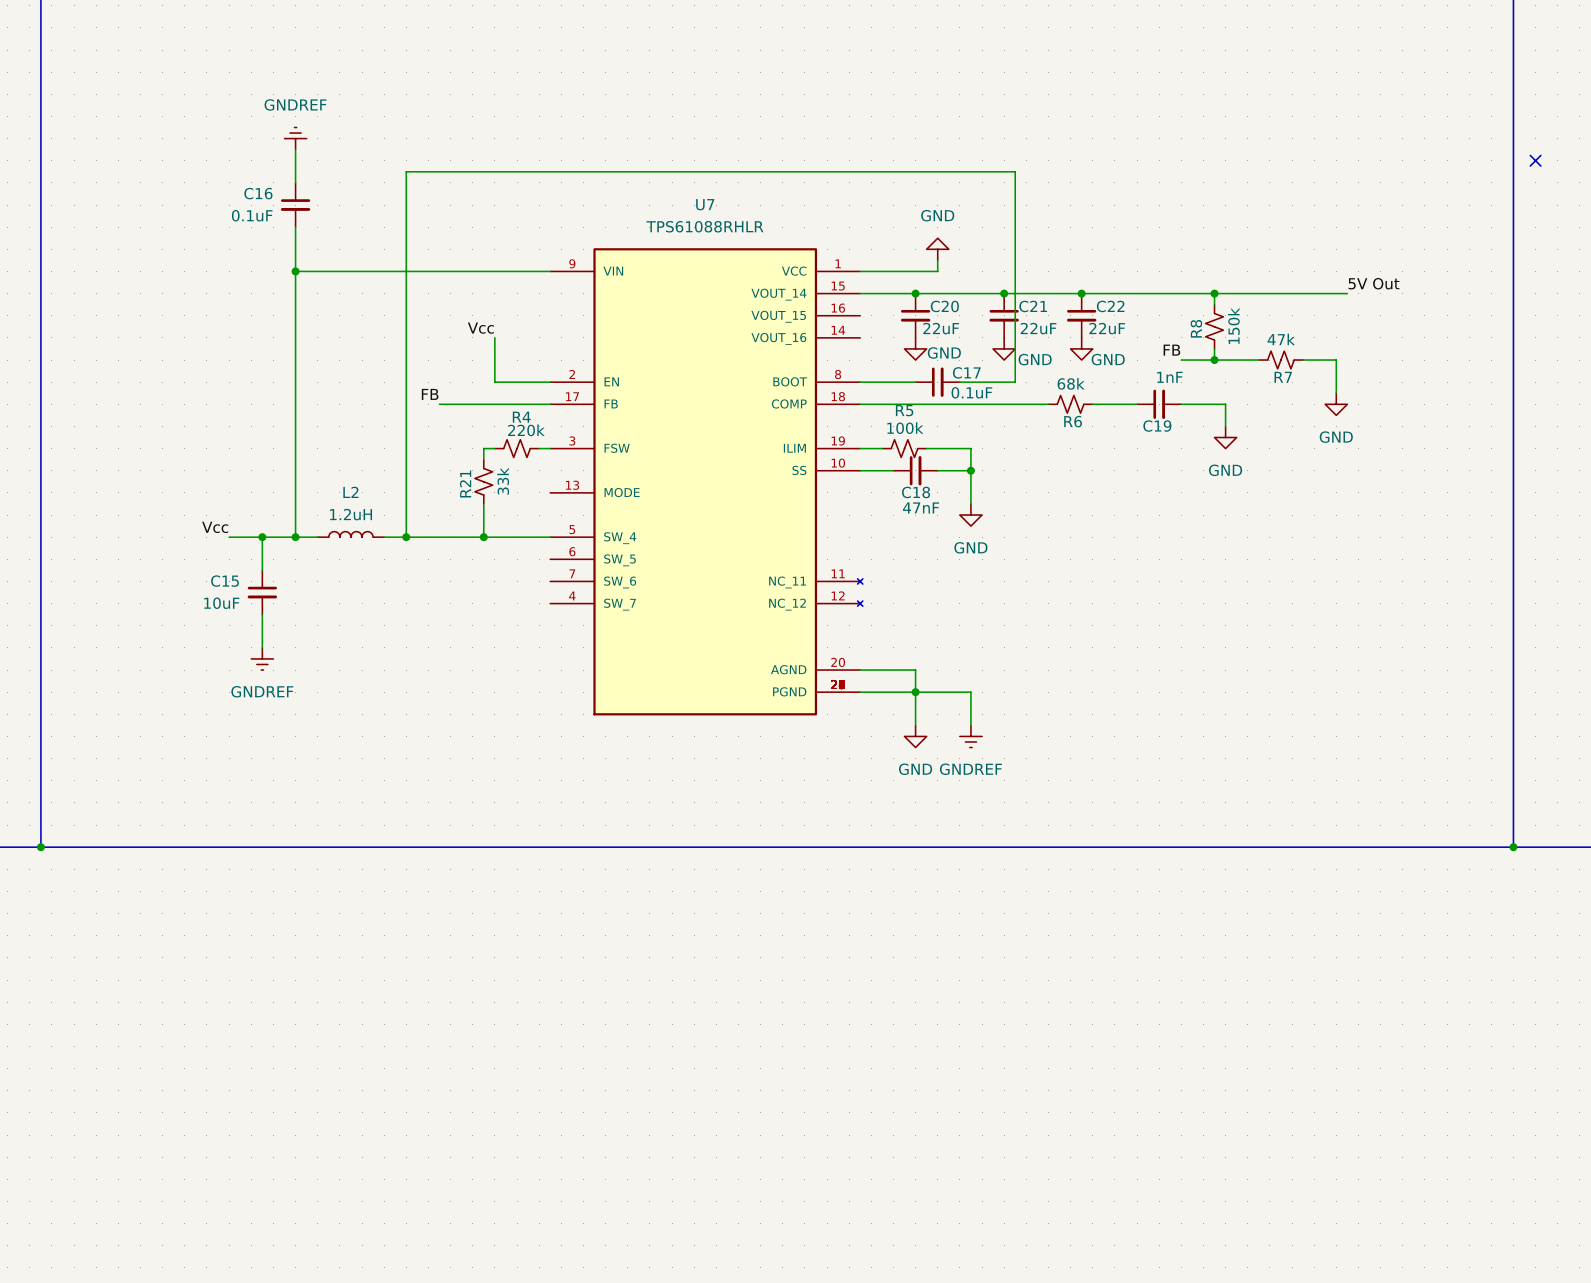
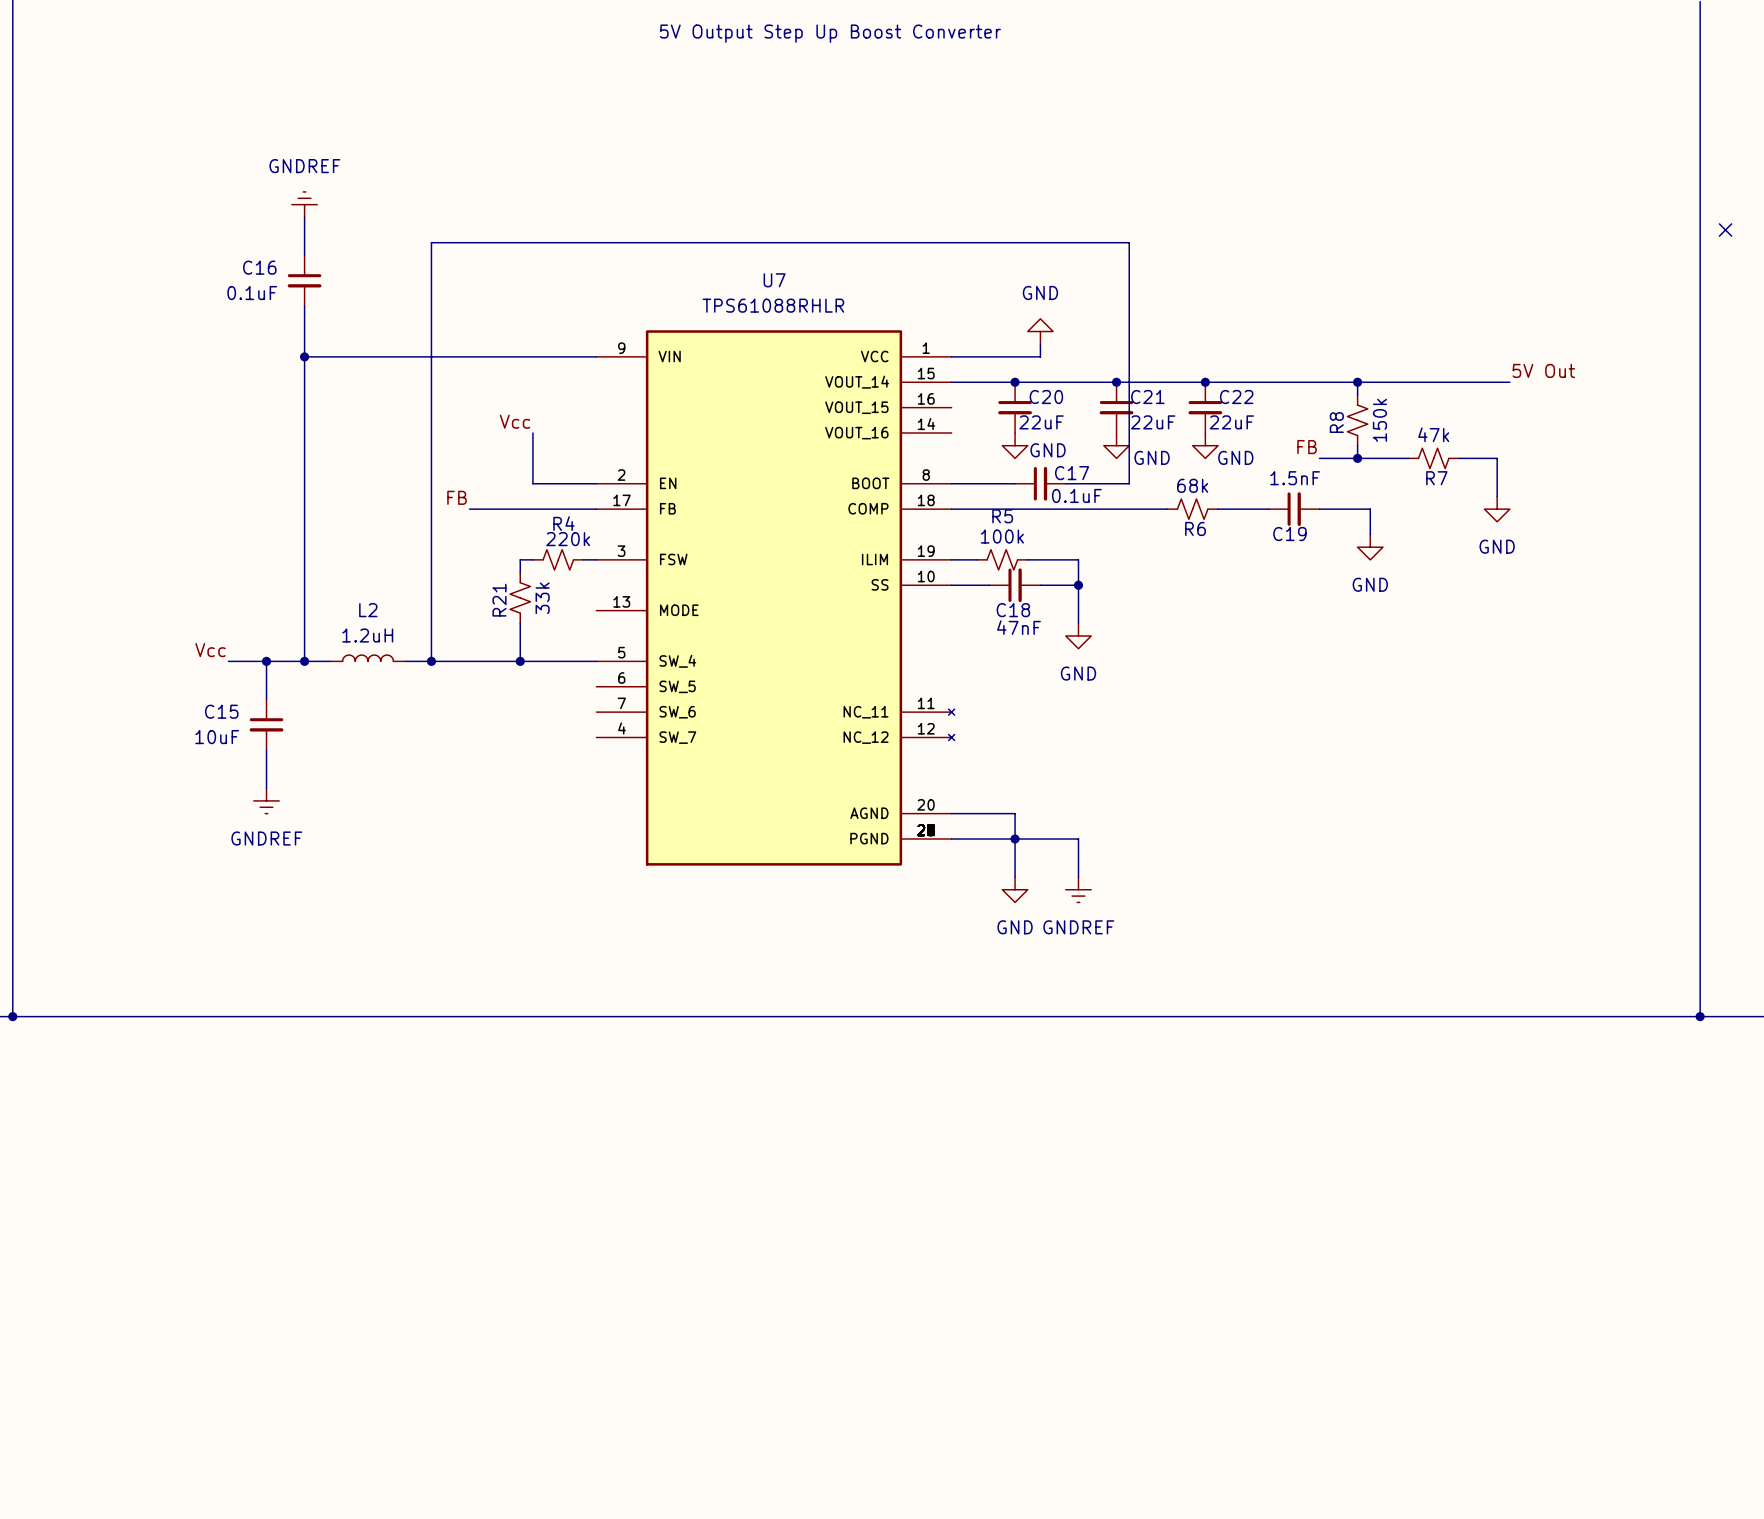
C19 value: 1nF (1169, 377) -> 1.5nF (1295, 478)

